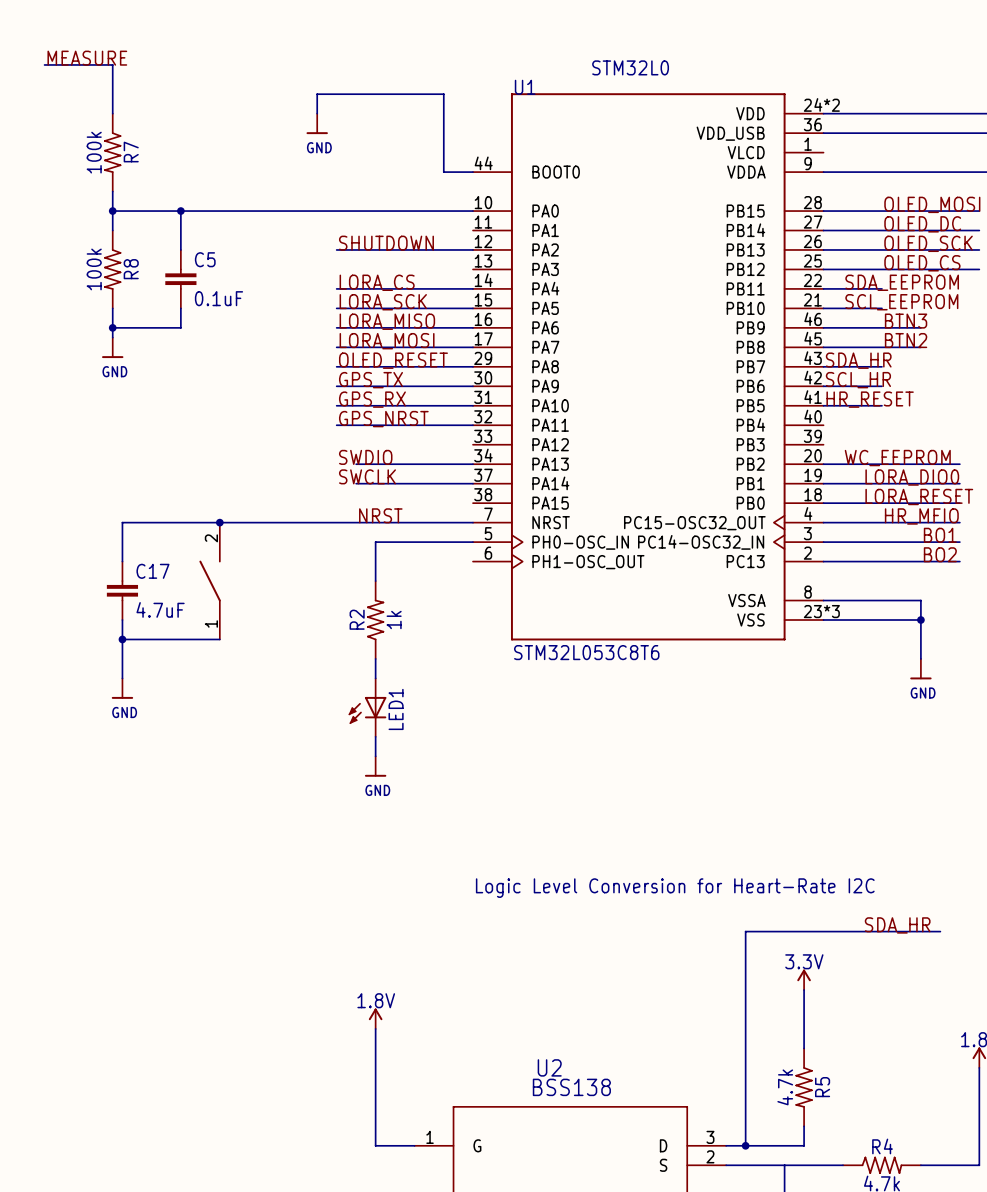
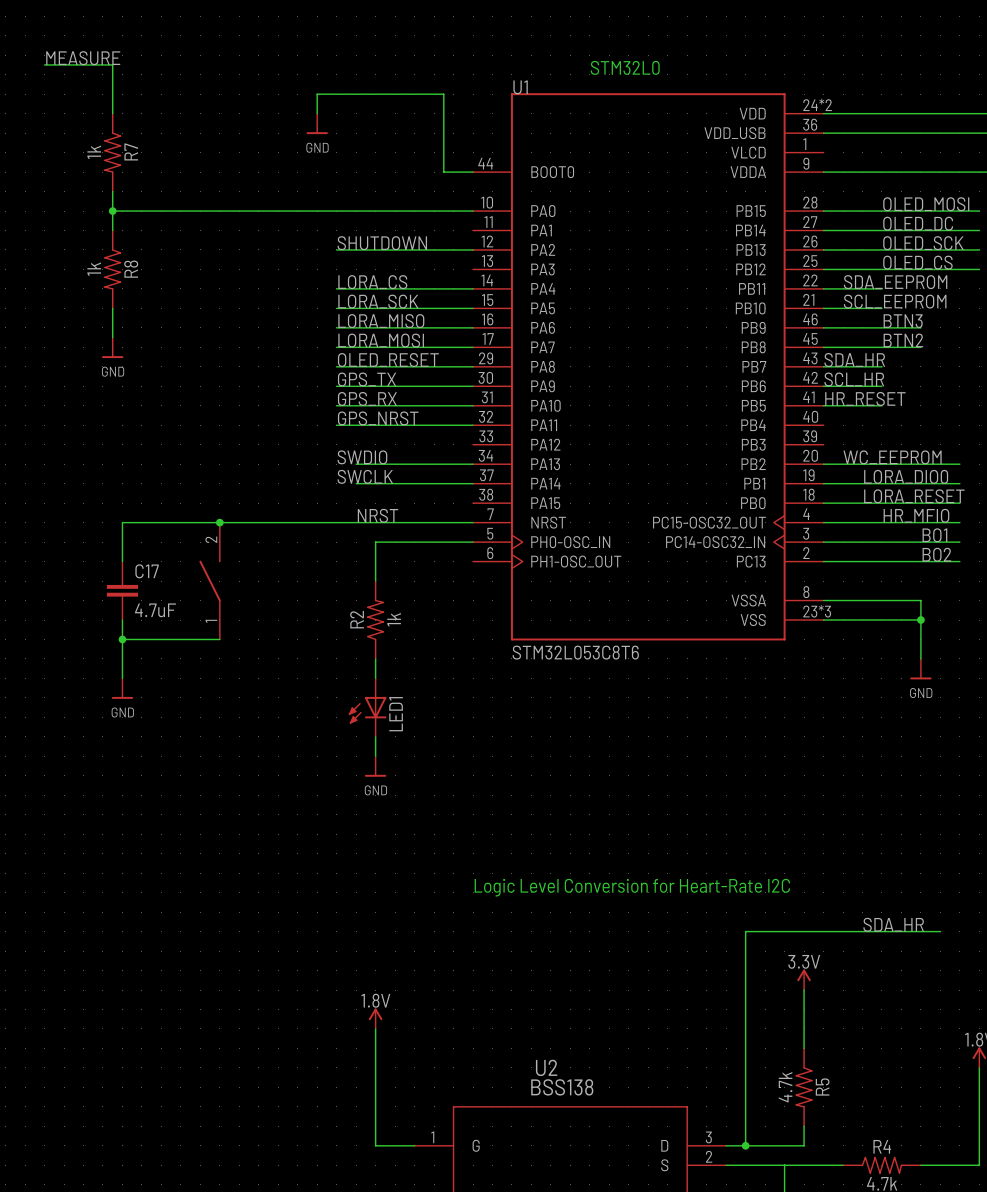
R7 value: 100k (94, 152) -> 1k (94, 152)
wire: (180, 211) (180, 249) -> none
junction: (180, 211) -> none
R8 value: 100k (94, 269) -> 1k (94, 269)
C5: 0.1uF (180, 279) -> none
wire: (180, 308) (180, 327) (112, 327) -> none
junction: (112, 327) -> none

